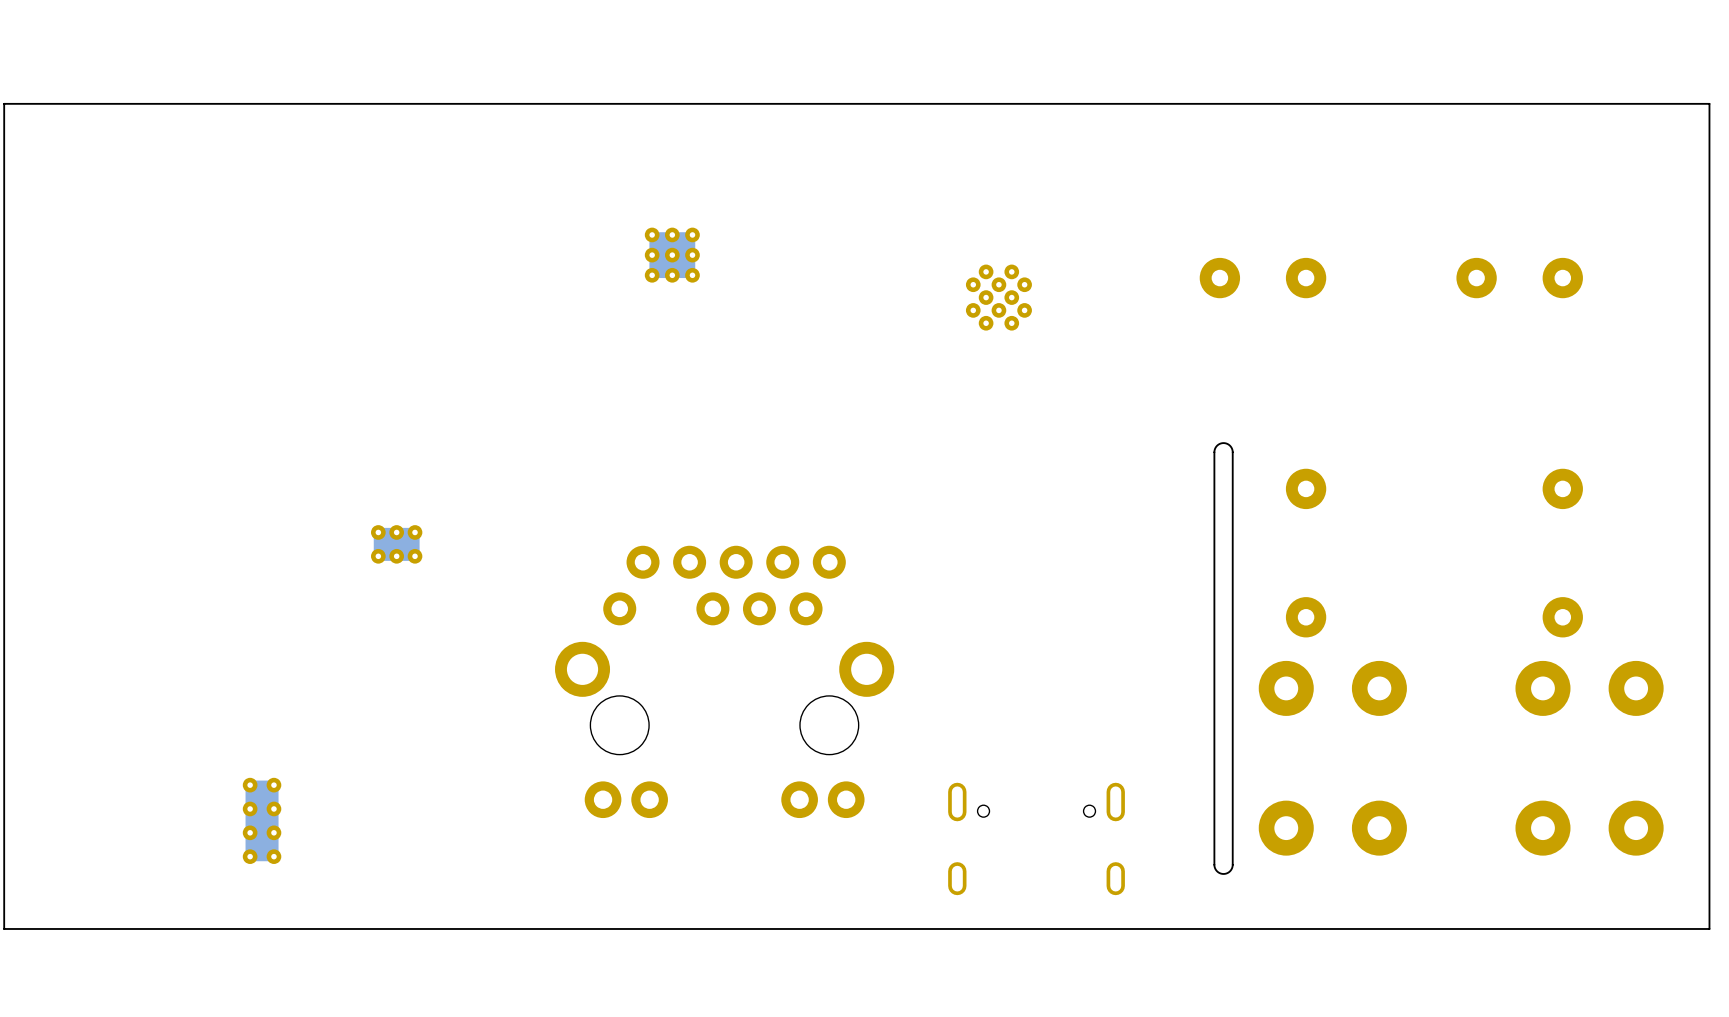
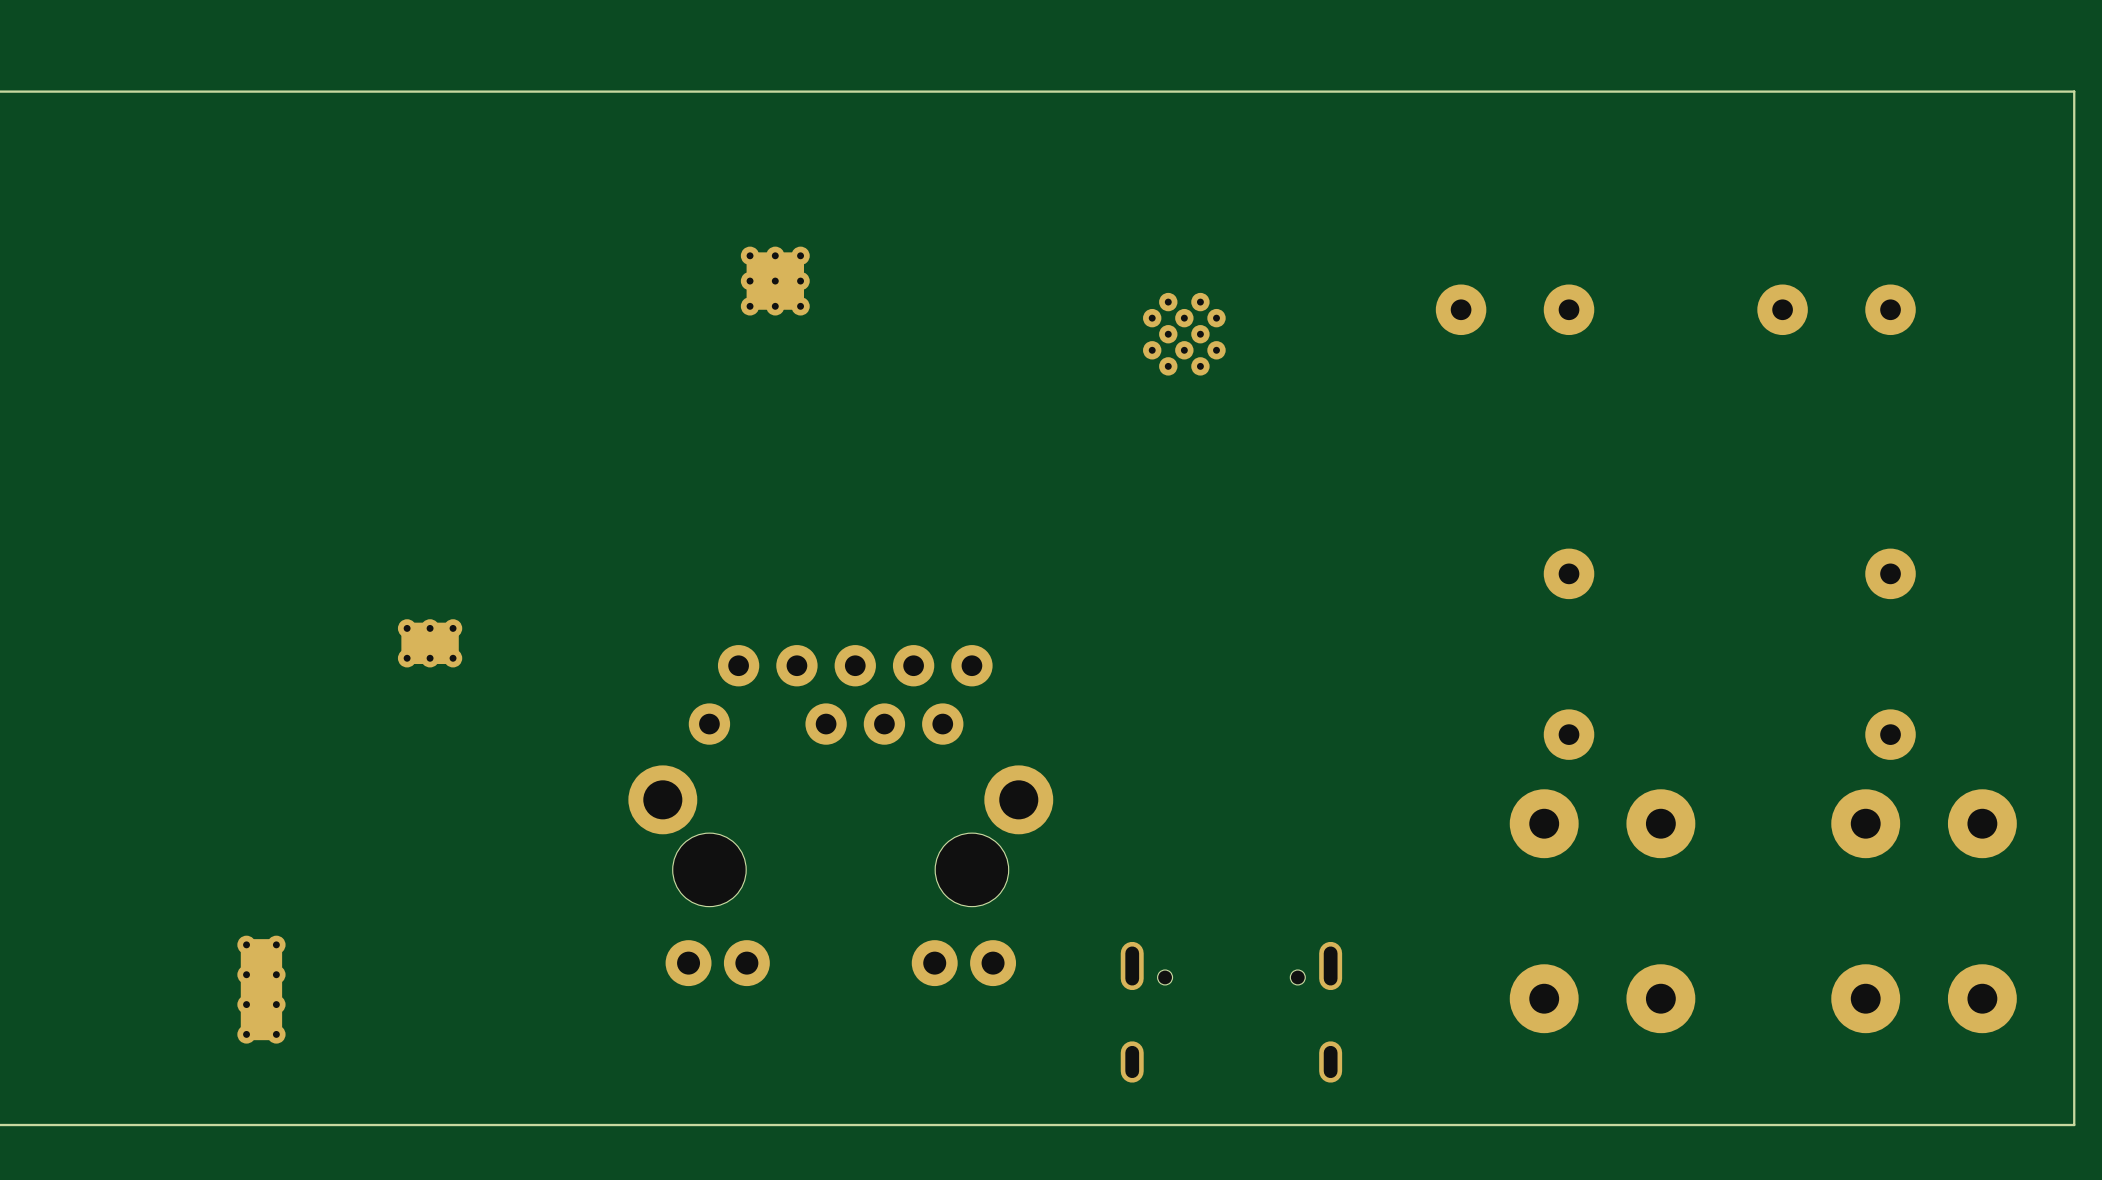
board edge: (1232, 452) (1232, 864) (1230, 871) (1223, 873) (1217, 871) (1214, 864) (1214, 452) (1217, 445) (1223, 443) (1230, 445) (1232, 452) -> none

